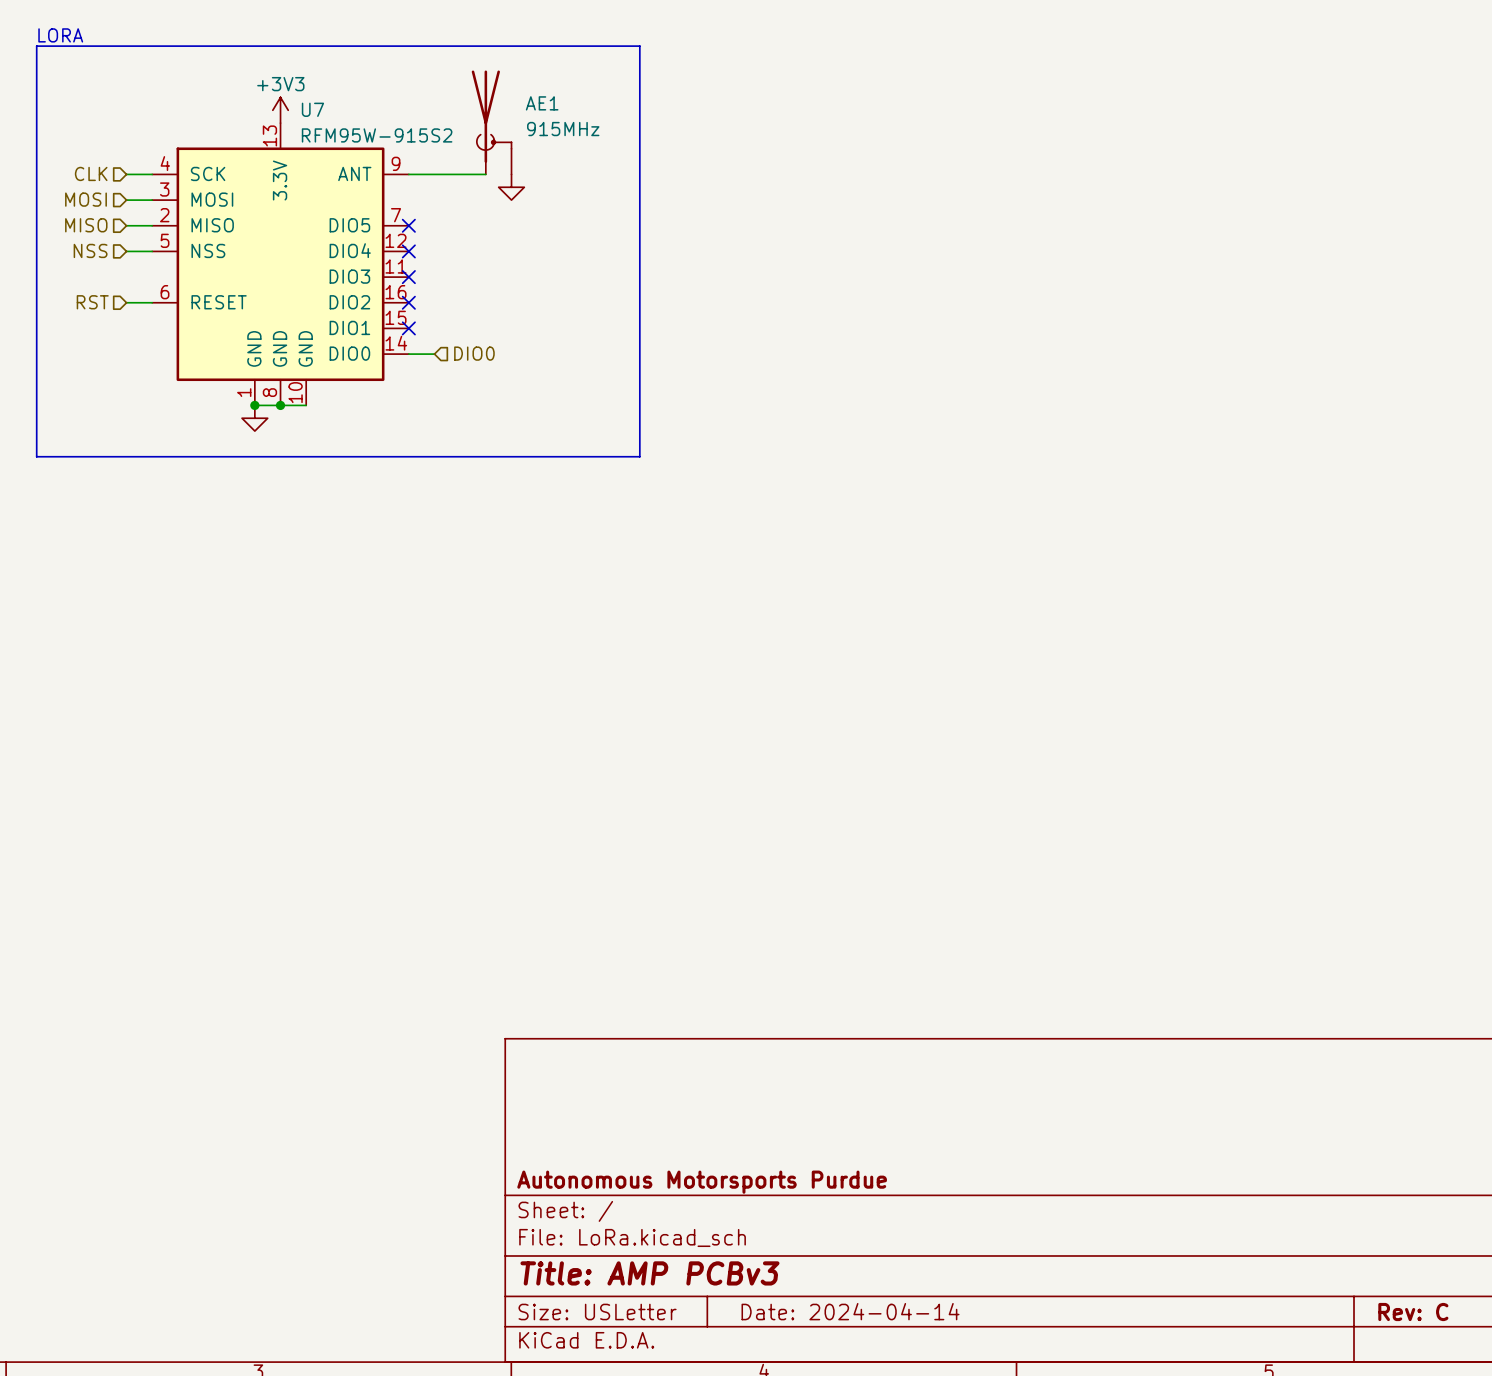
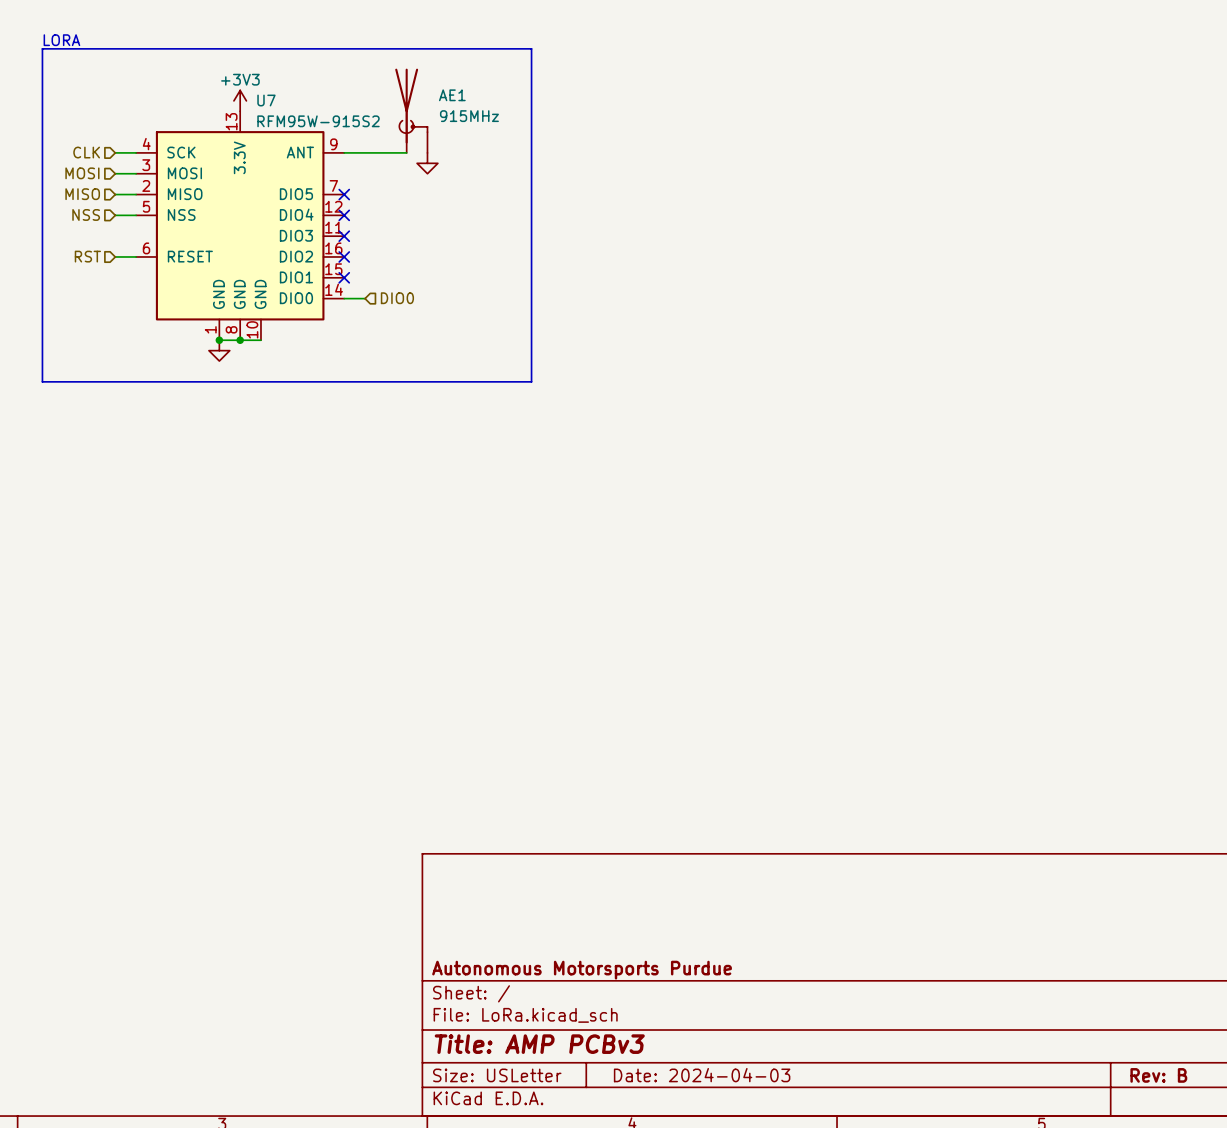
title block: Date: 2024-04-14 (850, 1311) -> Date: 2024-04-03 (702, 1075)
title block: Rev: C (1413, 1312) -> Rev: B (1158, 1075)

